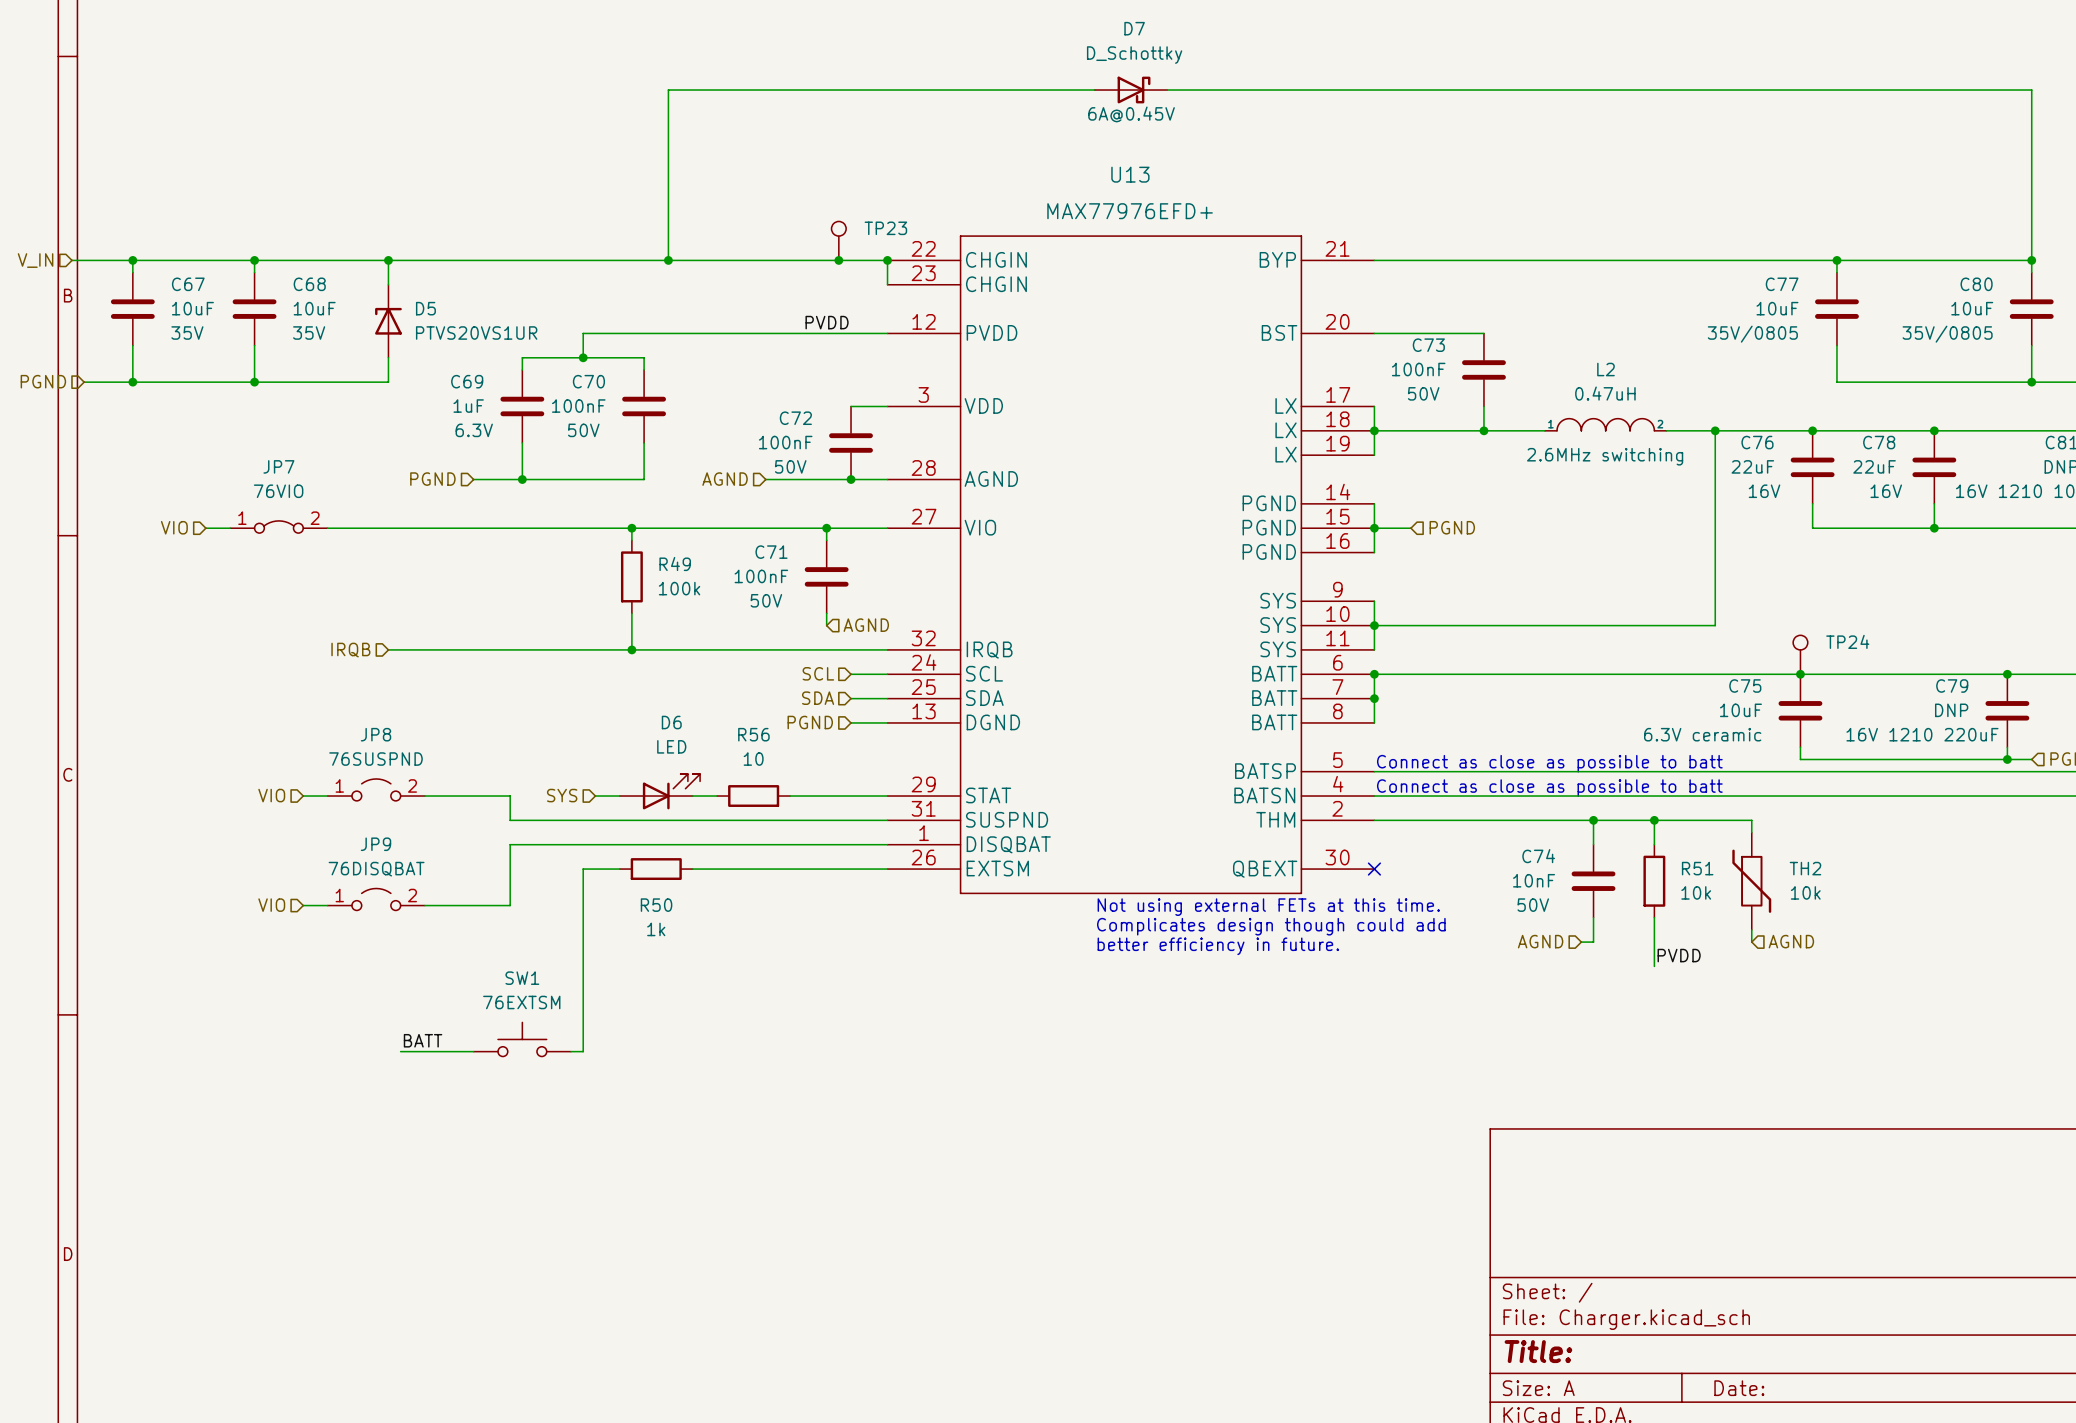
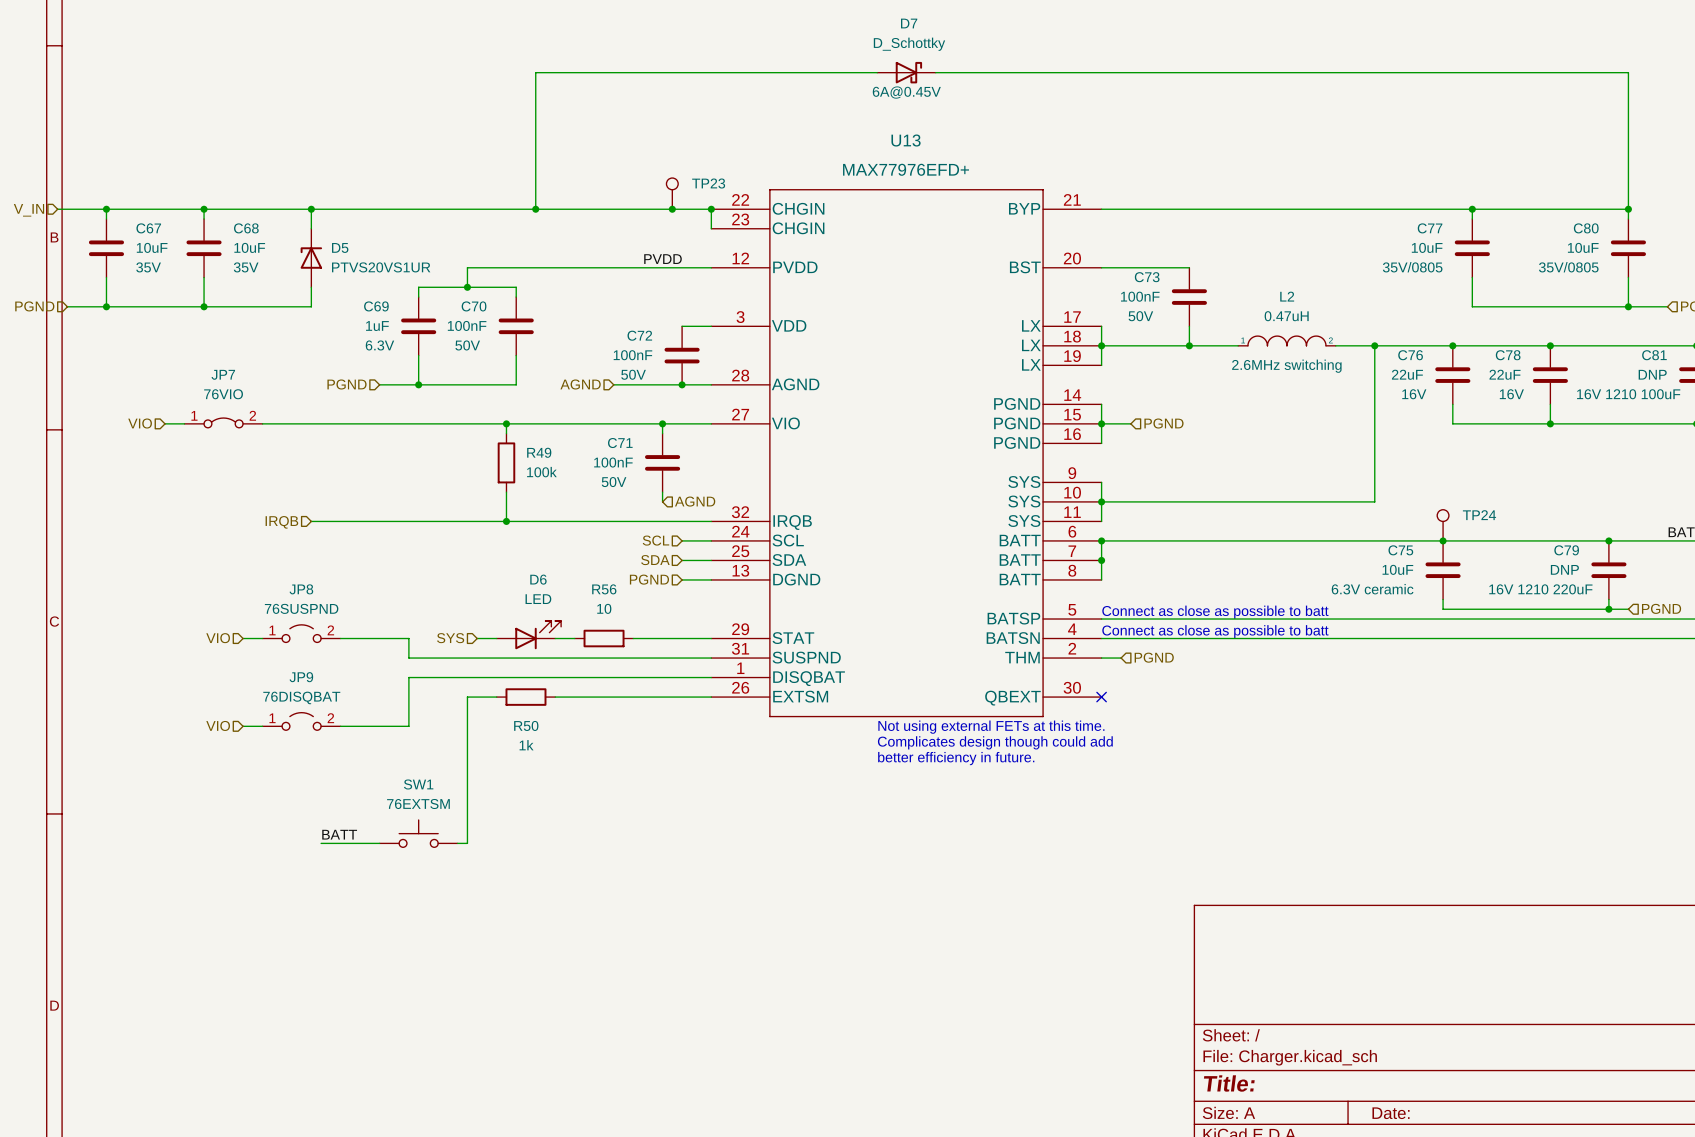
hierarchical label: none -> PGND (1154, 657)
wire: (1398, 820) (1751, 820) (1751, 832) -> none
wire: (1593, 820) (1593, 844) -> none
junction: (1593, 820) -> none
wire: (1654, 820) (1654, 844) -> none
junction: (1654, 820) -> none
C74: 10nF (1593, 881) -> none
R51: 10k (1654, 881) -> none
TH2: 10k (1751, 881) -> none
wire: (1593, 917) (1593, 942) (1581, 942) -> none
wire: (1654, 917) (1654, 966) -> none
wire: (1751, 929) (1751, 942) -> none
hierarchical label: AGND (1540, 941) -> none
hierarchical label: AGND (1791, 941) -> none
label: PVDD (1679, 955) -> none

